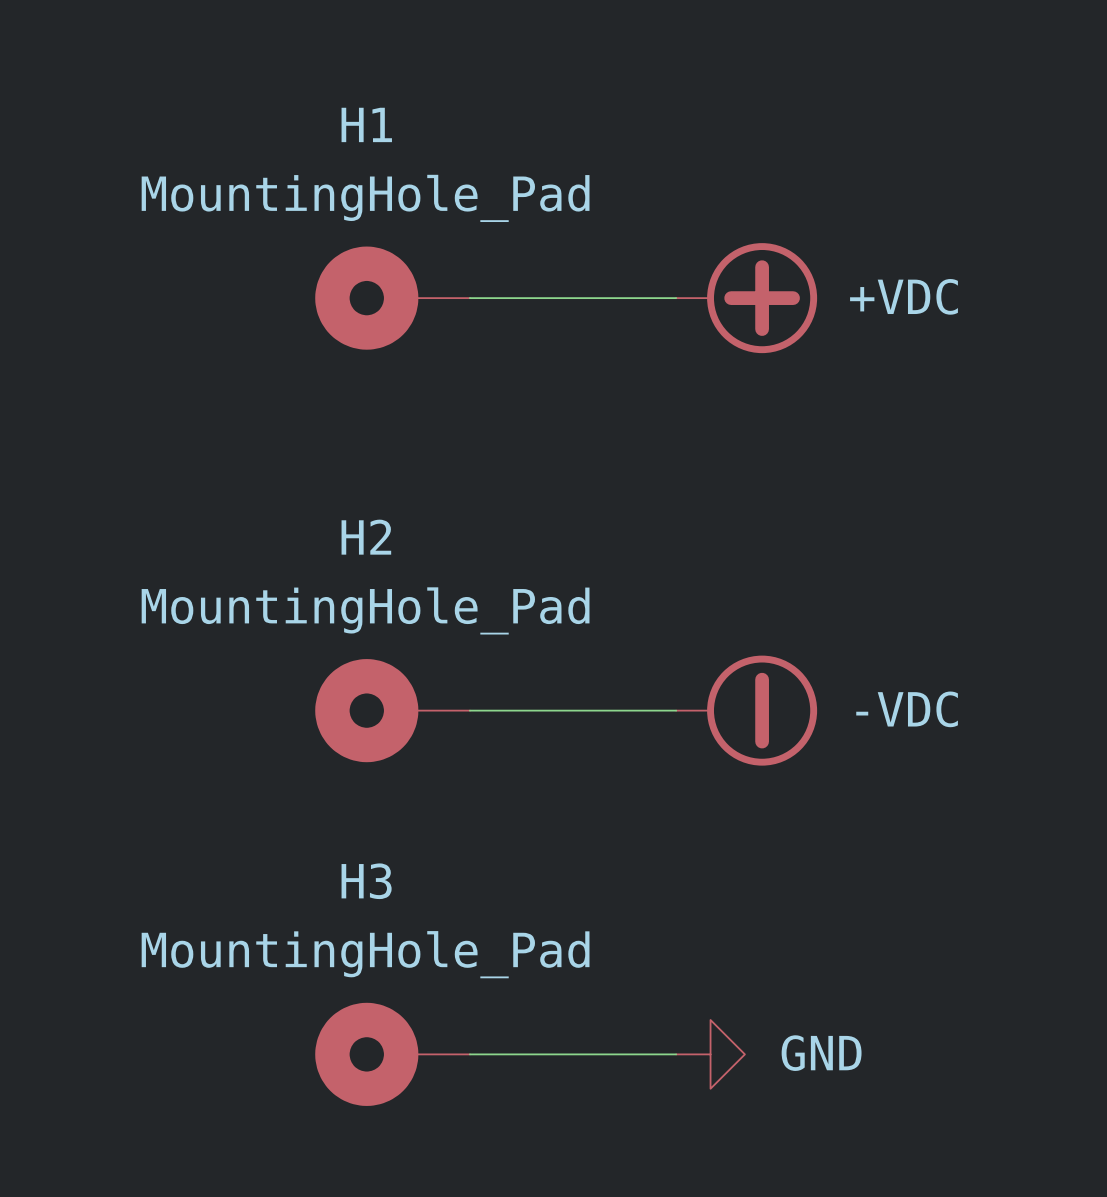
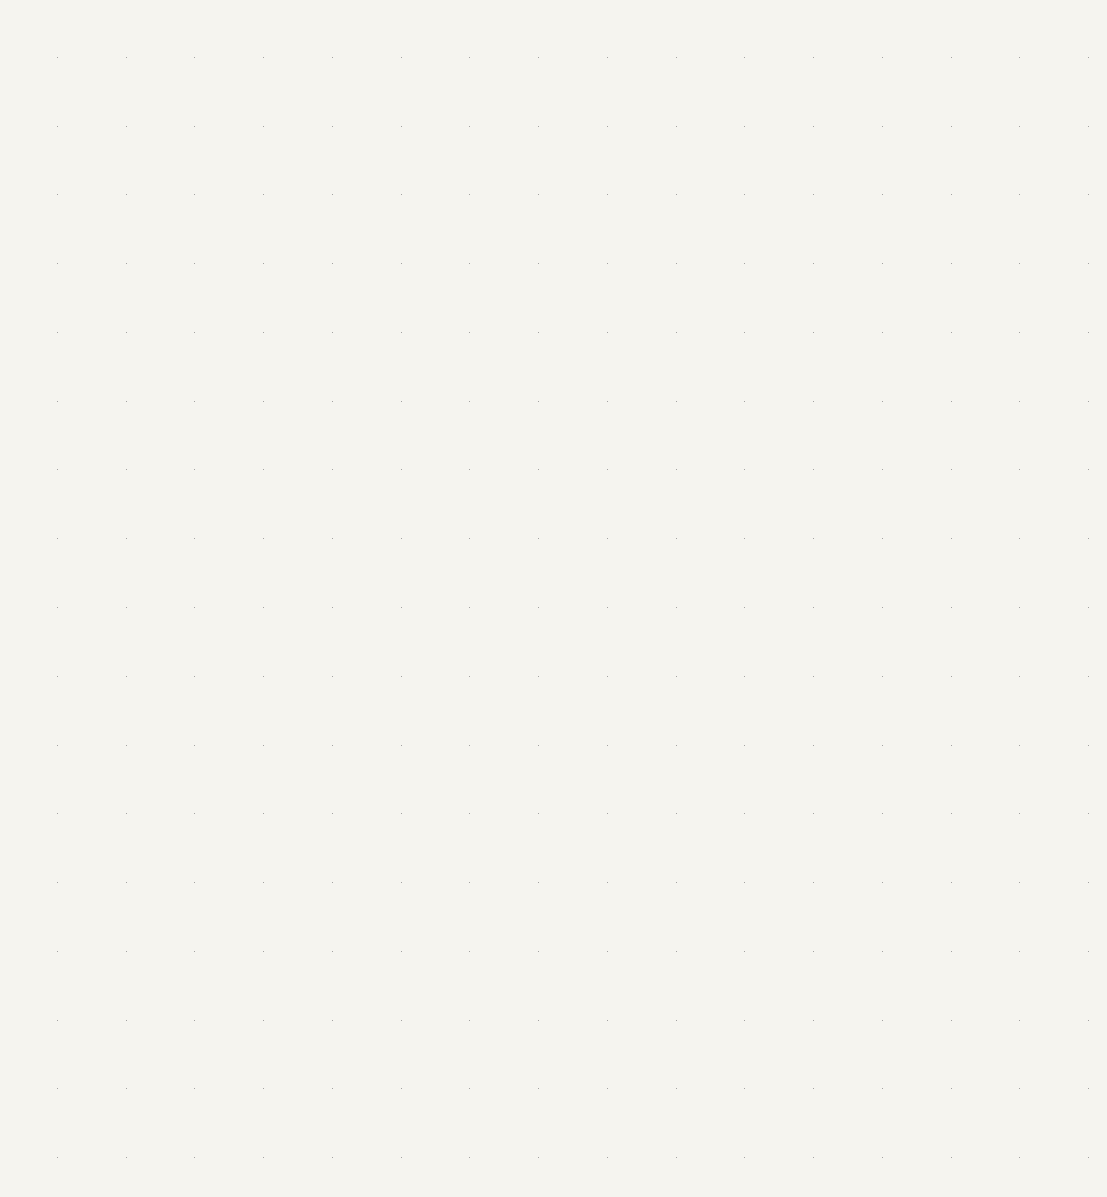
H1: MountingHole_Pad (392, 298) -> none
wire: (469, 298) (676, 298) -> none
power symbol: +VDC (746, 298) -> none
H2: MountingHole_Pad (392, 710) -> none
wire: (469, 710) (676, 710) -> none
power symbol: -VDC (746, 710) -> none
H3: MountingHole_Pad (392, 1054) -> none
wire: (469, 1054) (676, 1054) -> none
power symbol: GND (710, 1054) -> none

